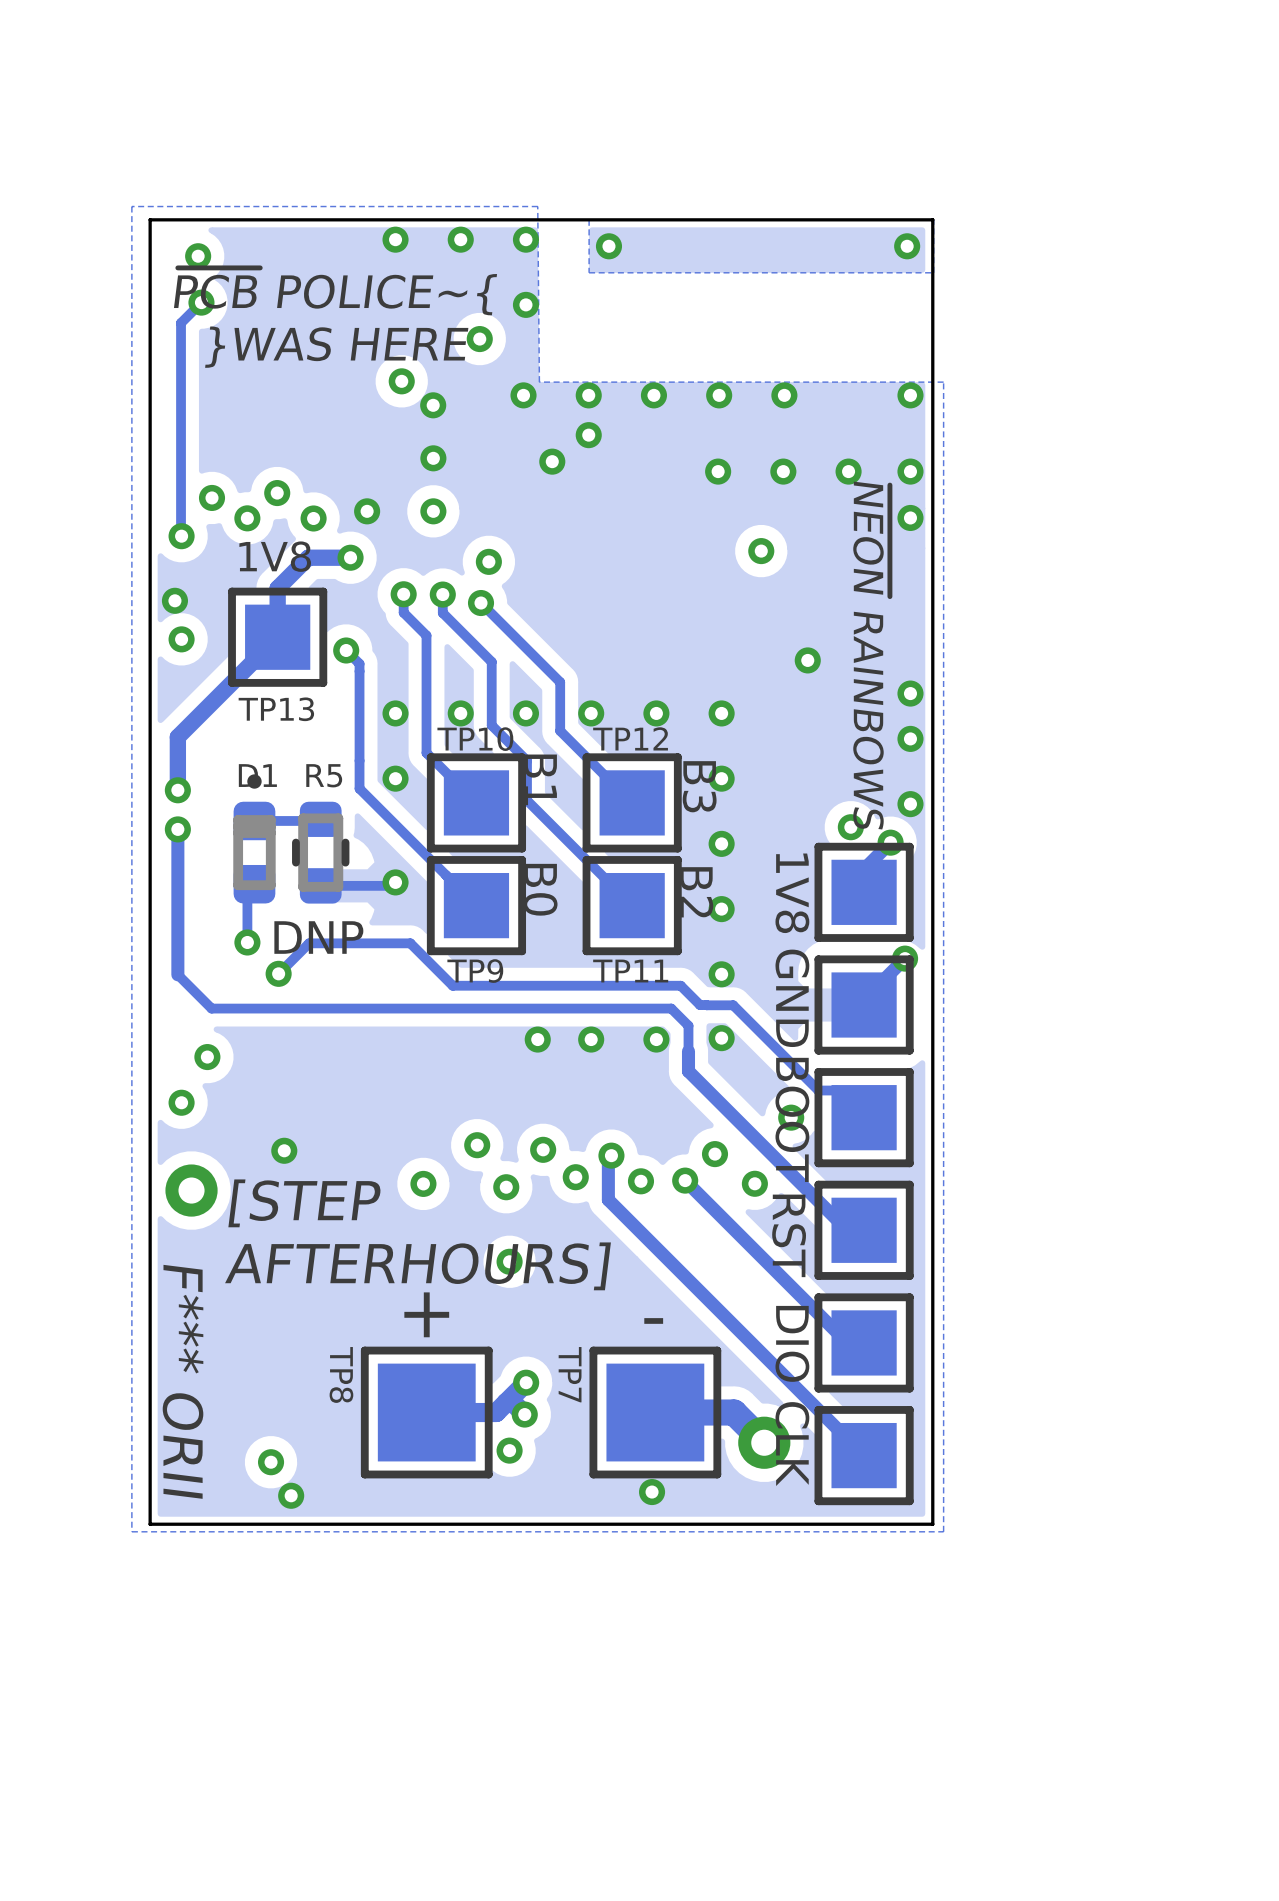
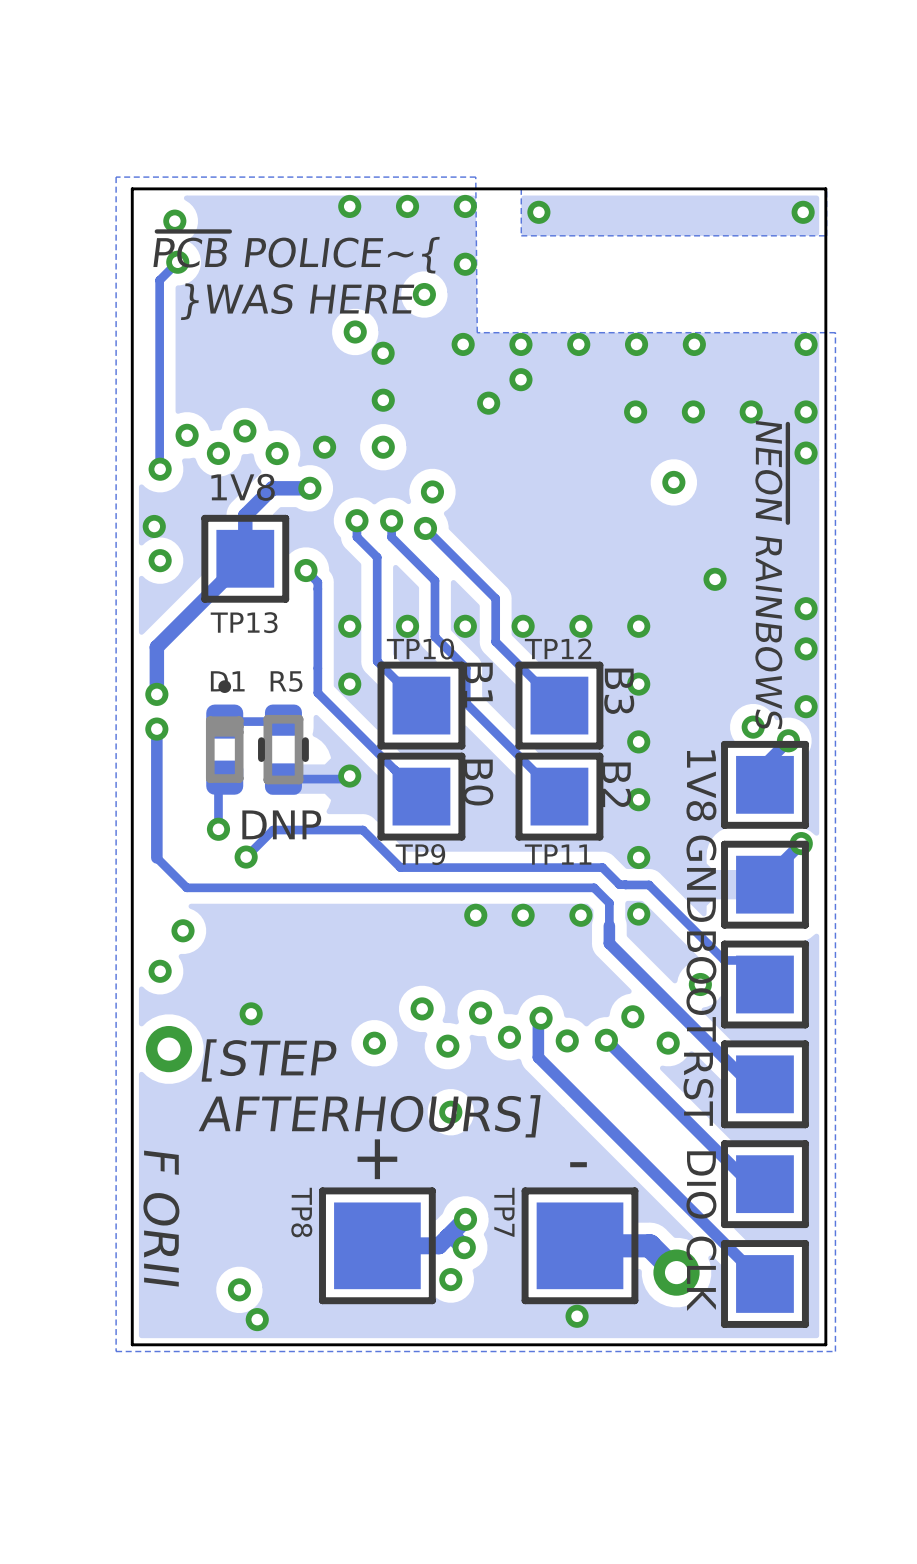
text: F*** ORII (183, 1381) -> F ORII (161, 1218)

